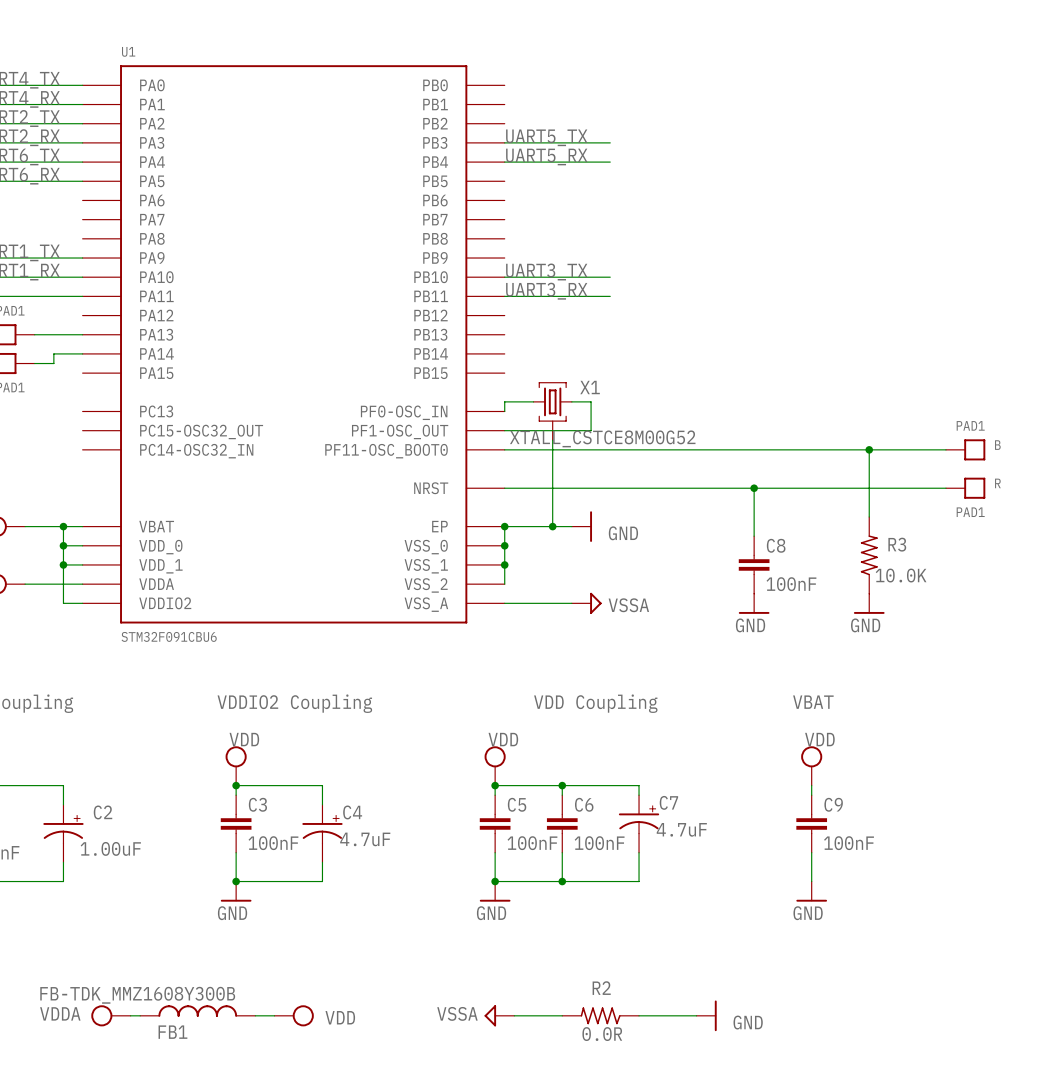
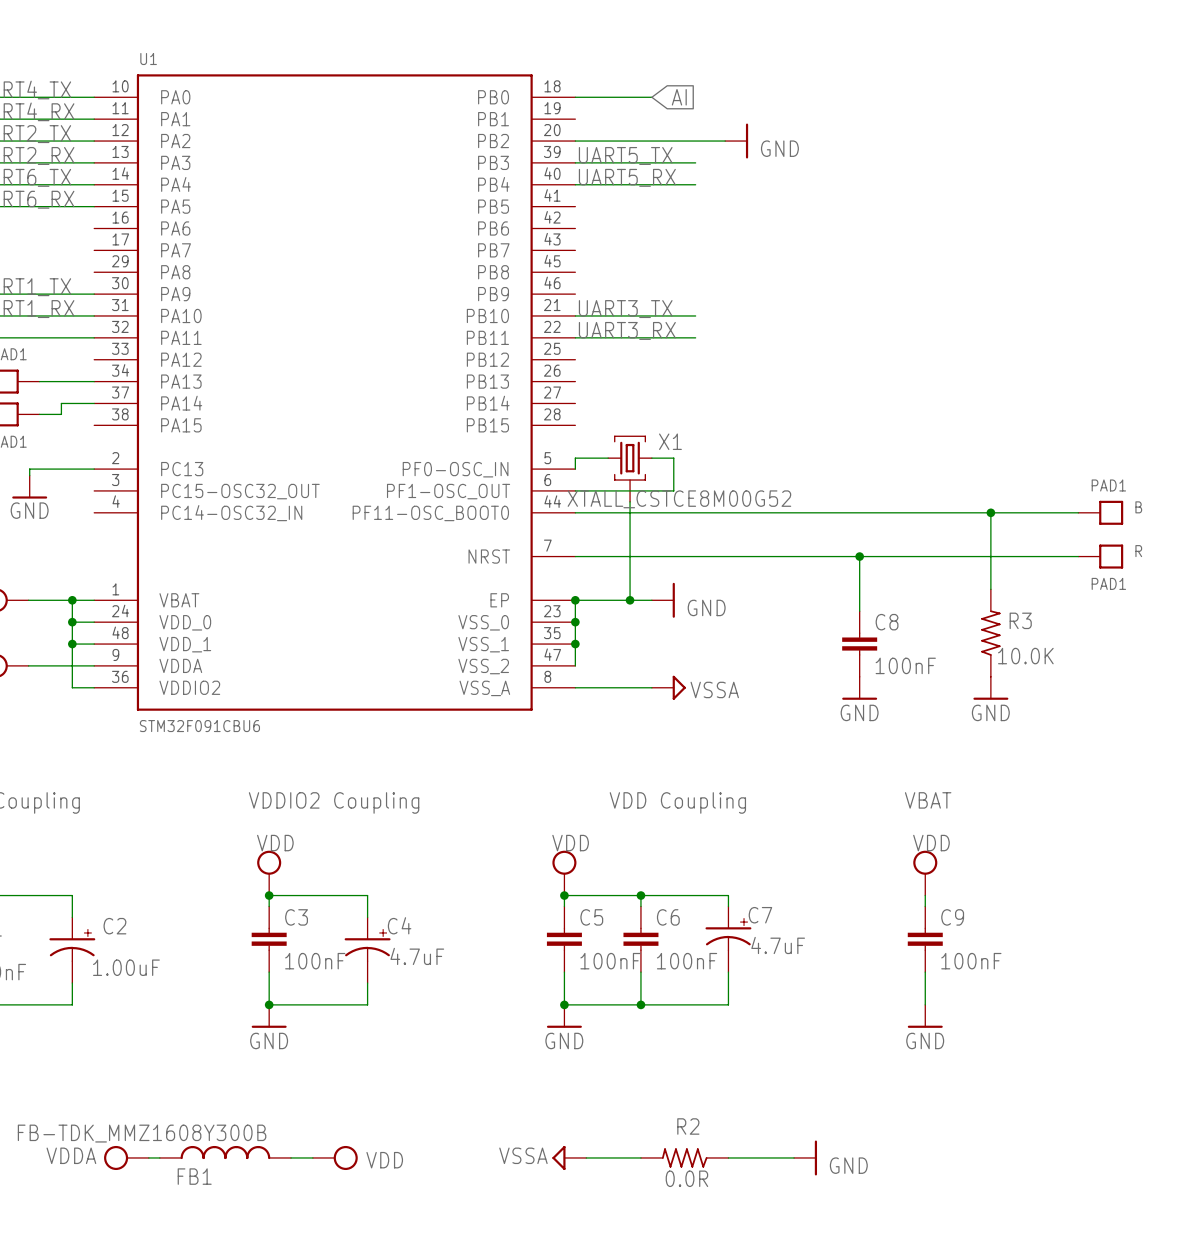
U1 symbol: [82, 65, 505, 624] -> [94, 74, 576, 711]
wire: none -> (575, 97) (651, 97)
global label: none -> AI (679, 97)
wire: none -> (575, 141) (725, 141)
power symbol: none -> GND (736, 141)
wire: none -> (94, 469) (29, 469) (29, 475)
power symbol: none -> GND (29, 487)

